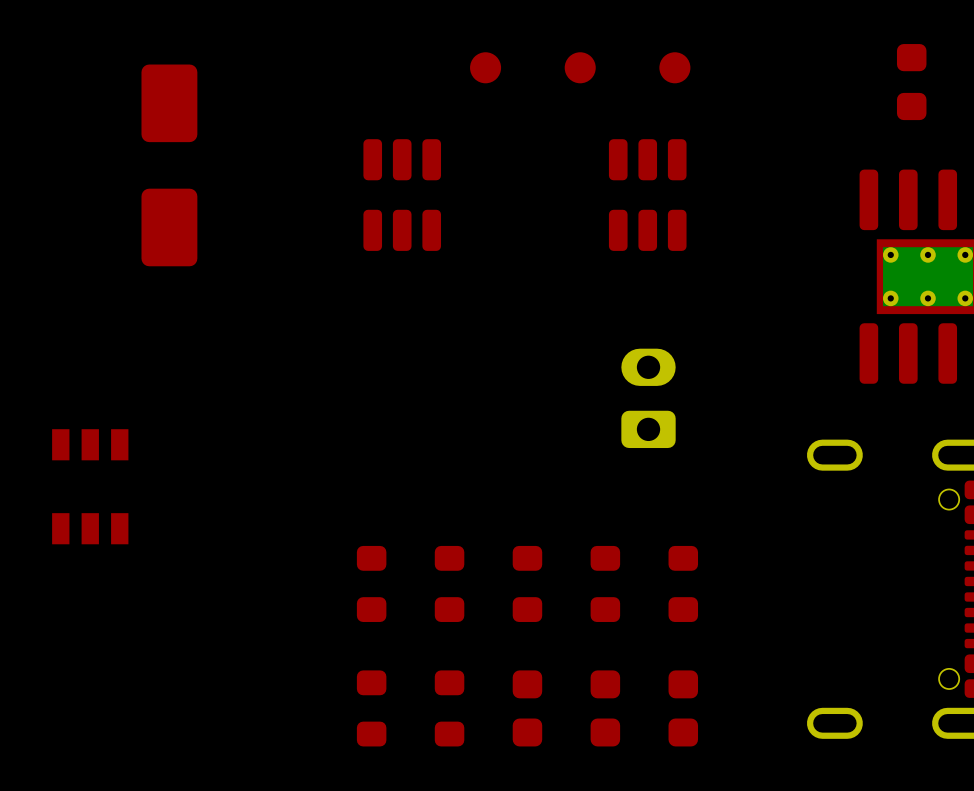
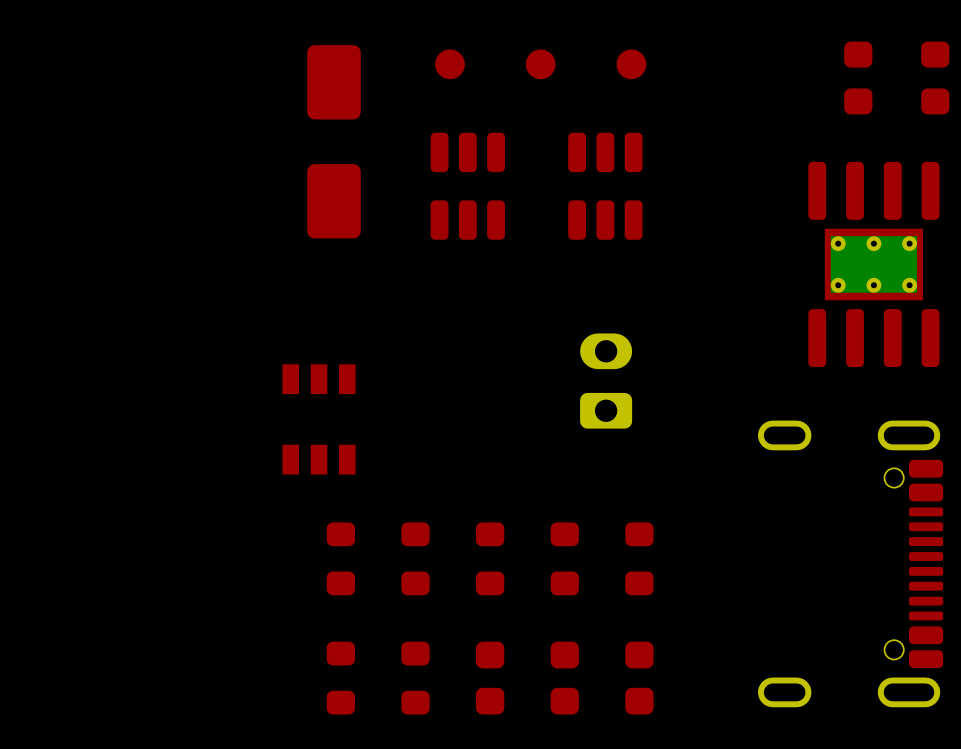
part position: (169, 165) -> (334, 141)
part position: (402, 195) -> (467, 186)
part position: (90, 486) -> (319, 419)

